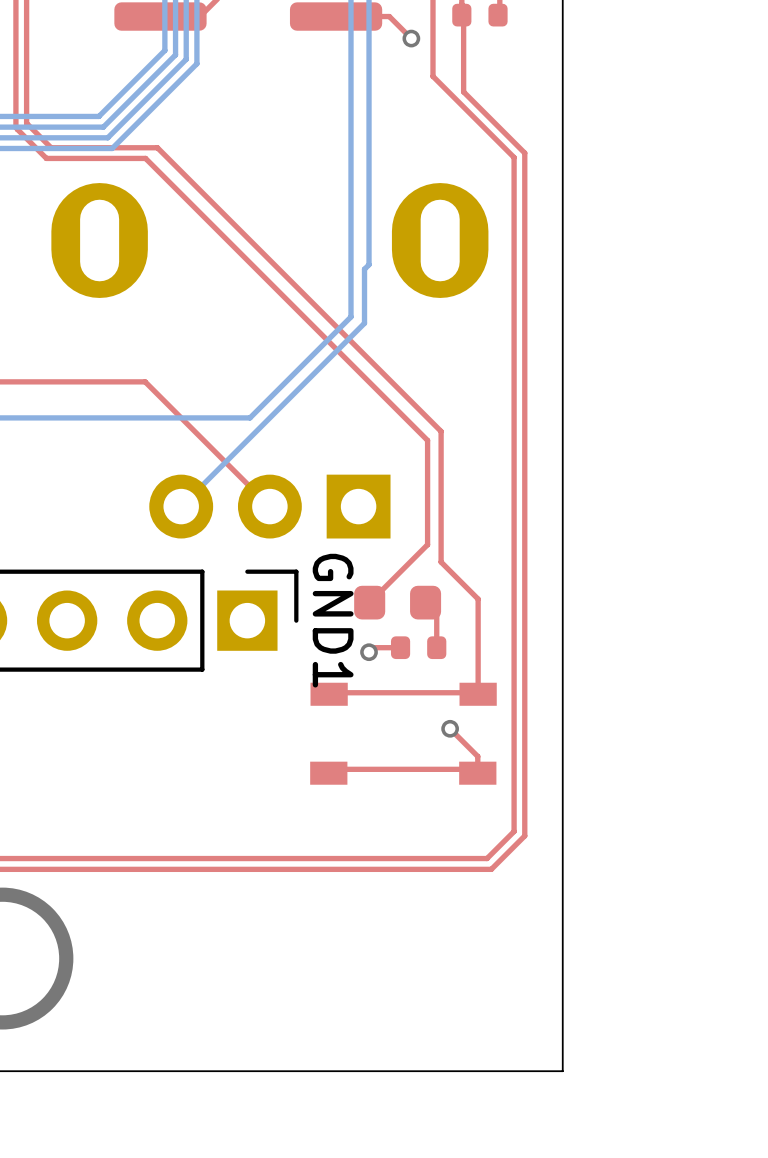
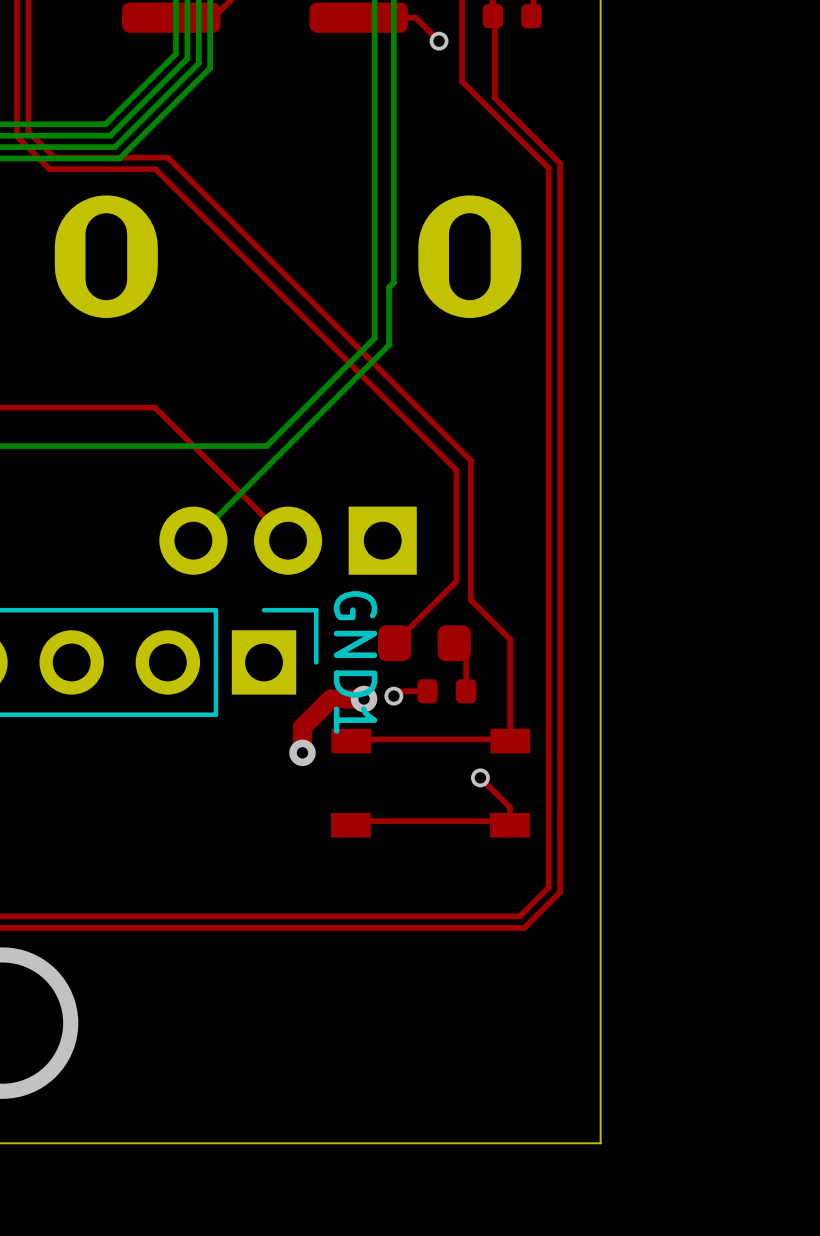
top track: none -> (364, 698) (330, 698) (302, 727) (302, 752)
via: none -> (364, 698)
via: none -> (302, 752)

